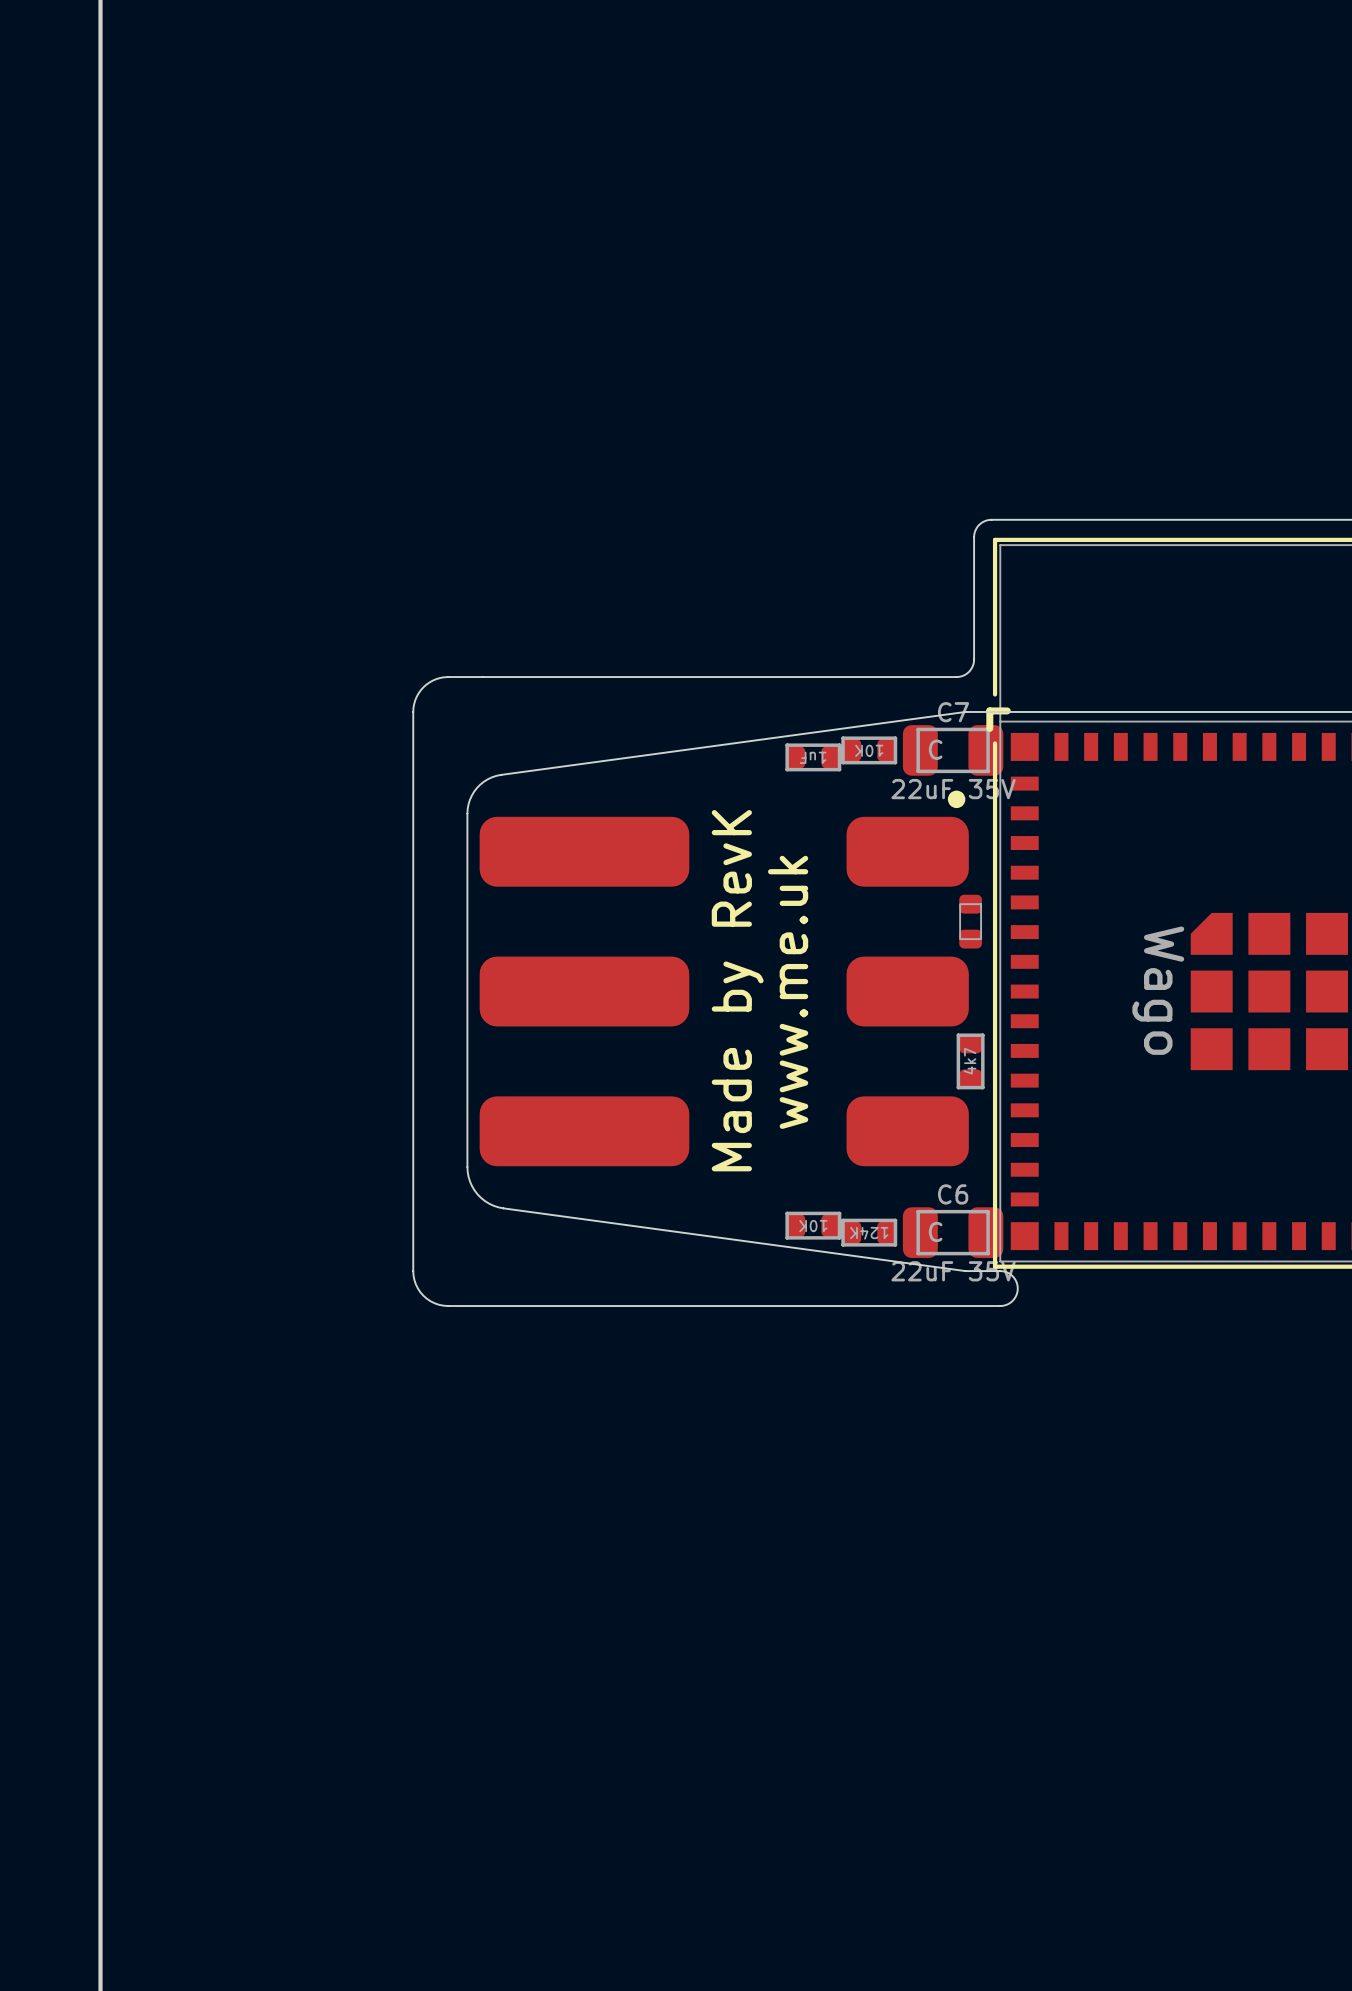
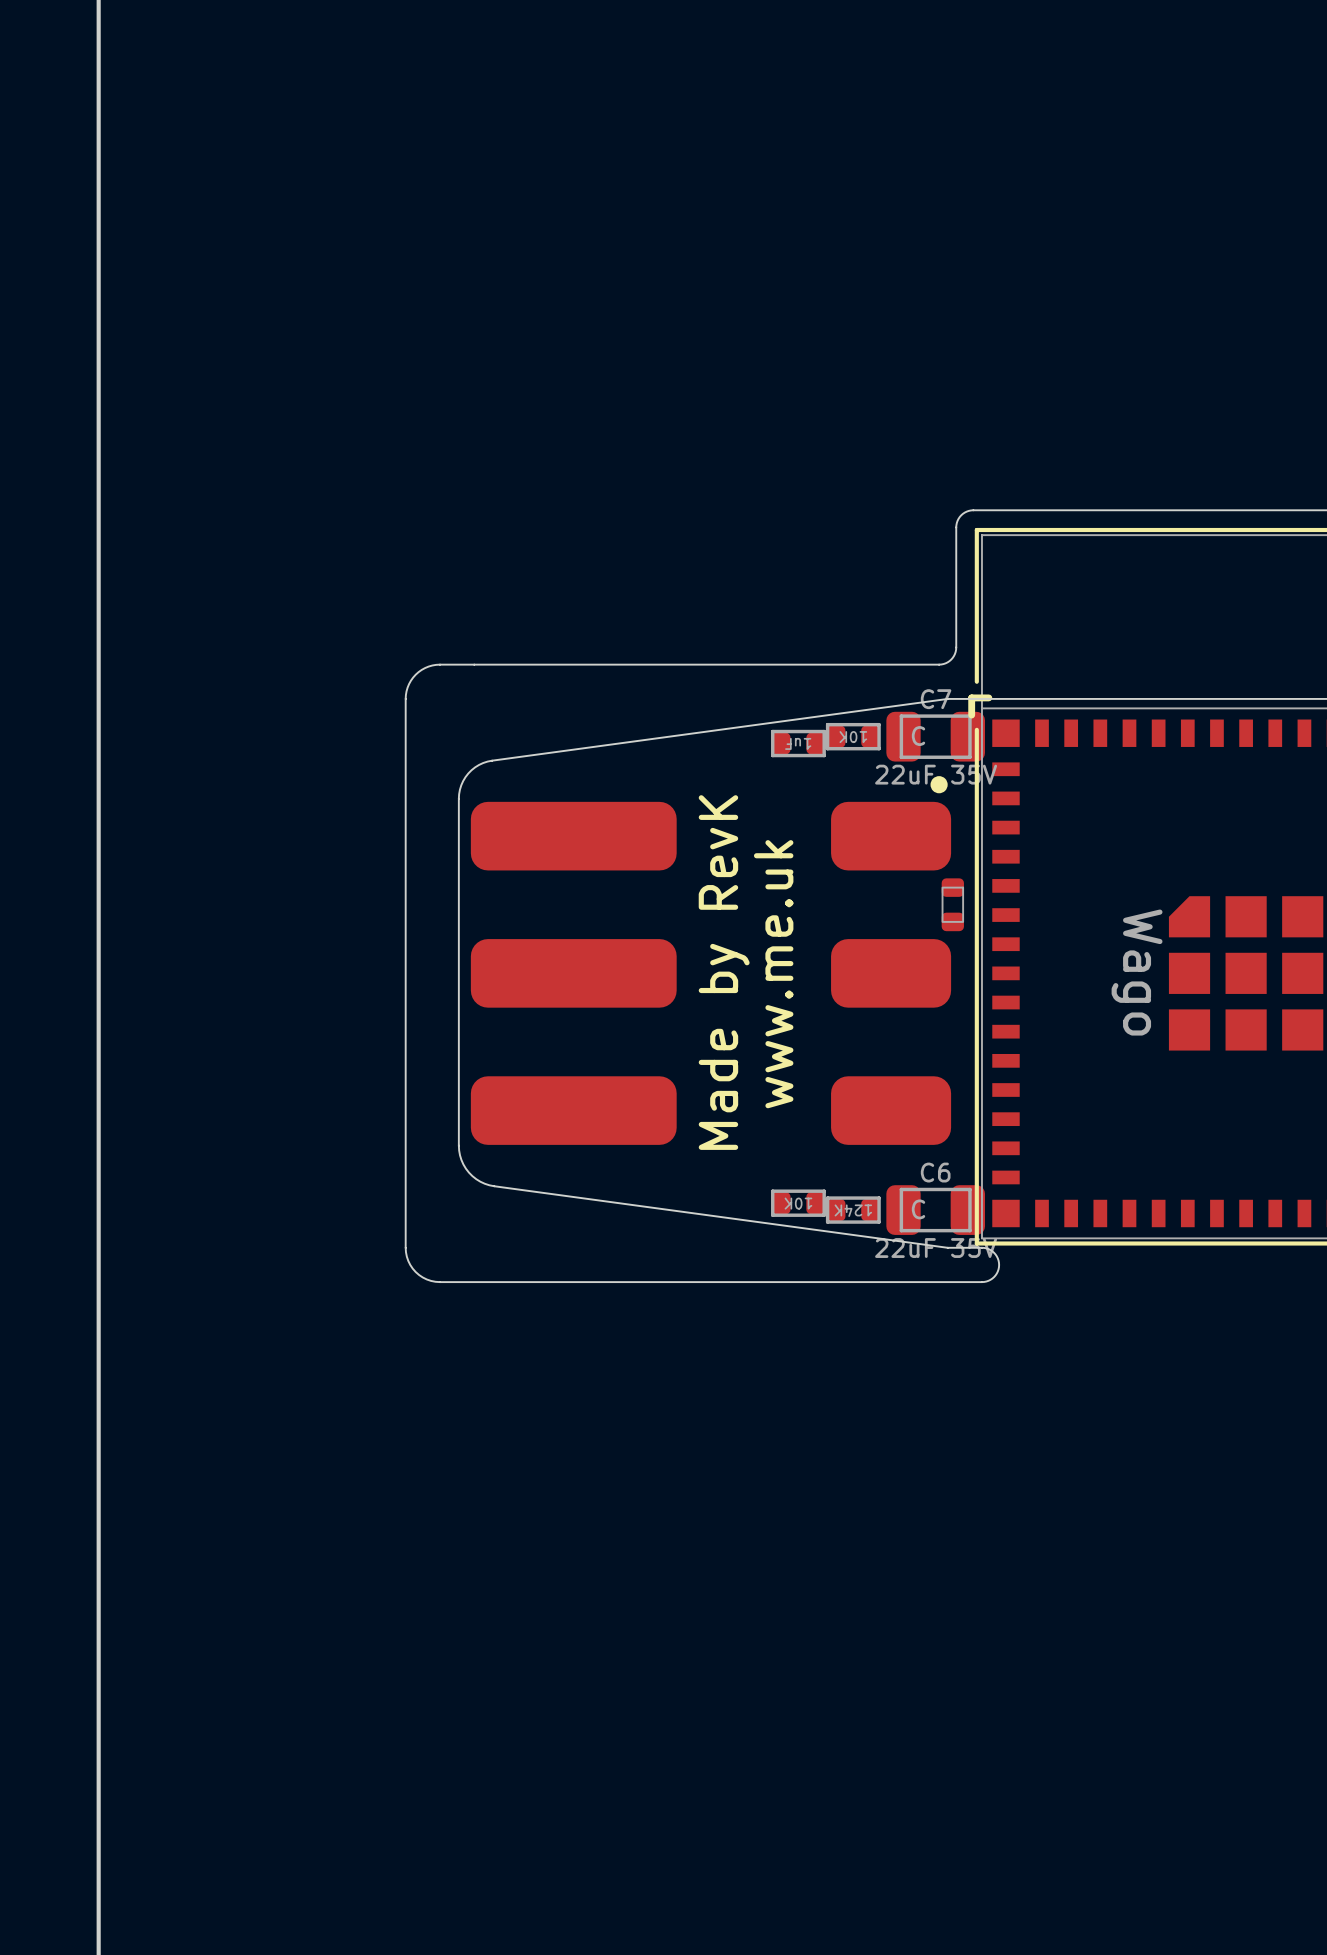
part: 4k7 (970, 1061) -> none

